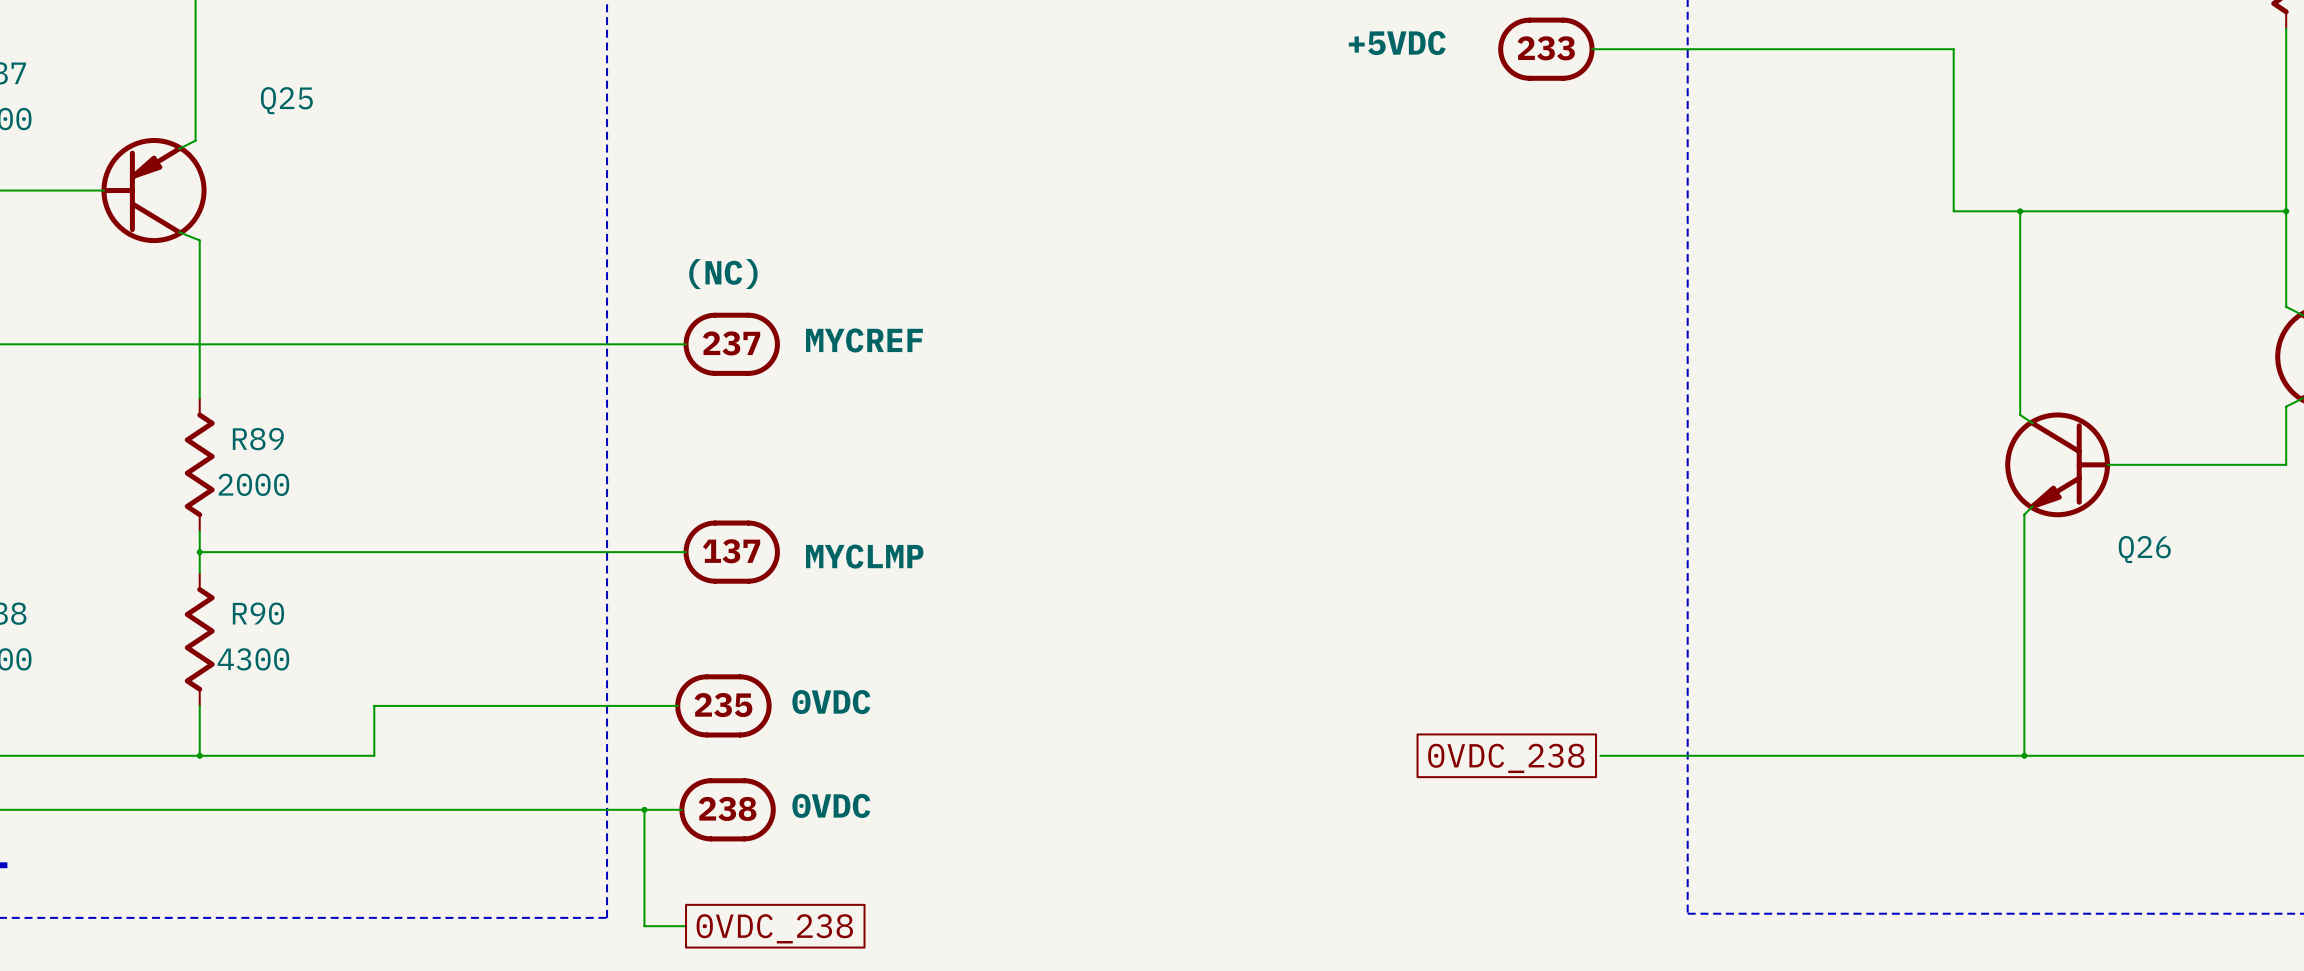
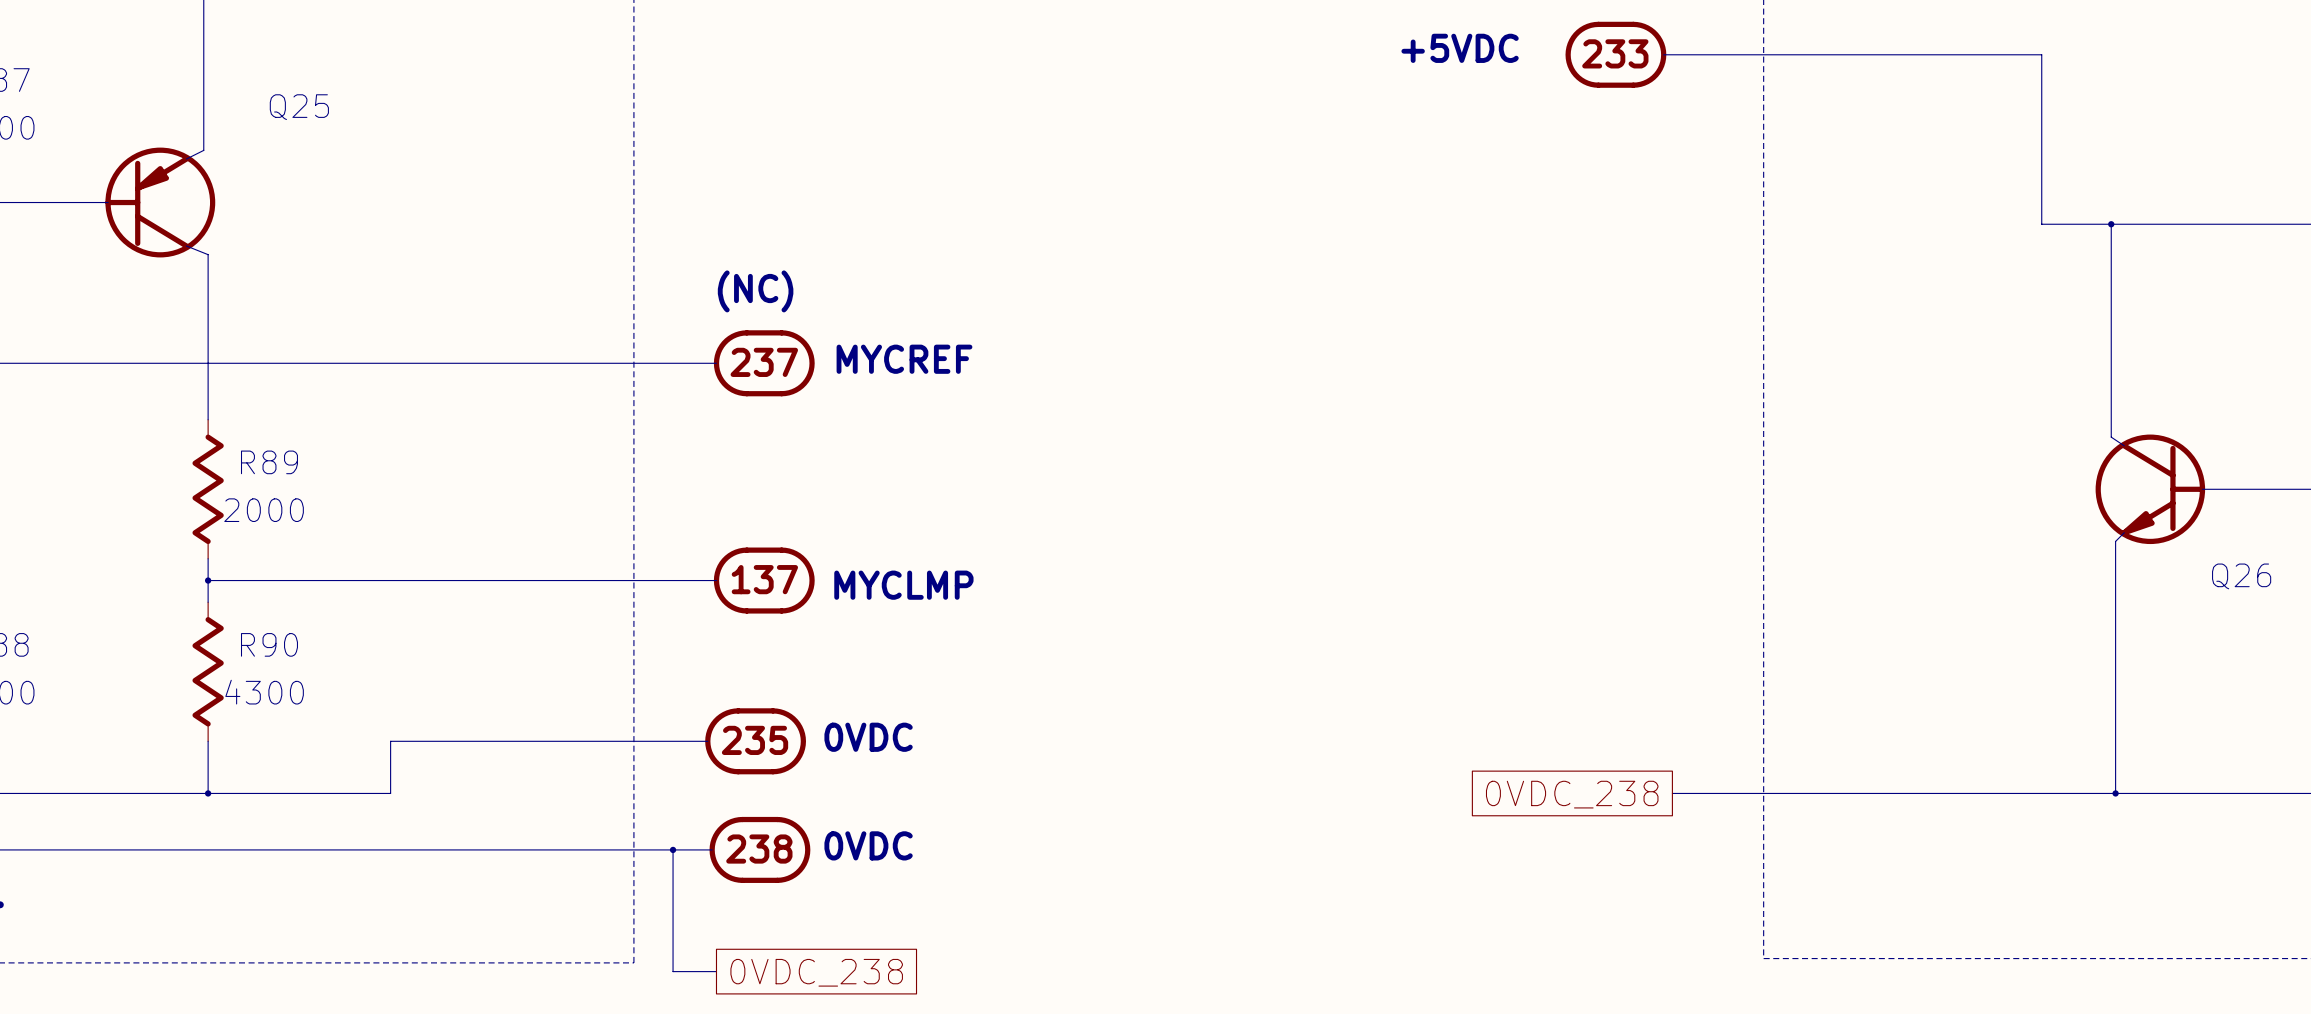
global label: 0VDC_238 (1506, 758) -> none
global label: none -> 0VDC_238 (1572, 794)

